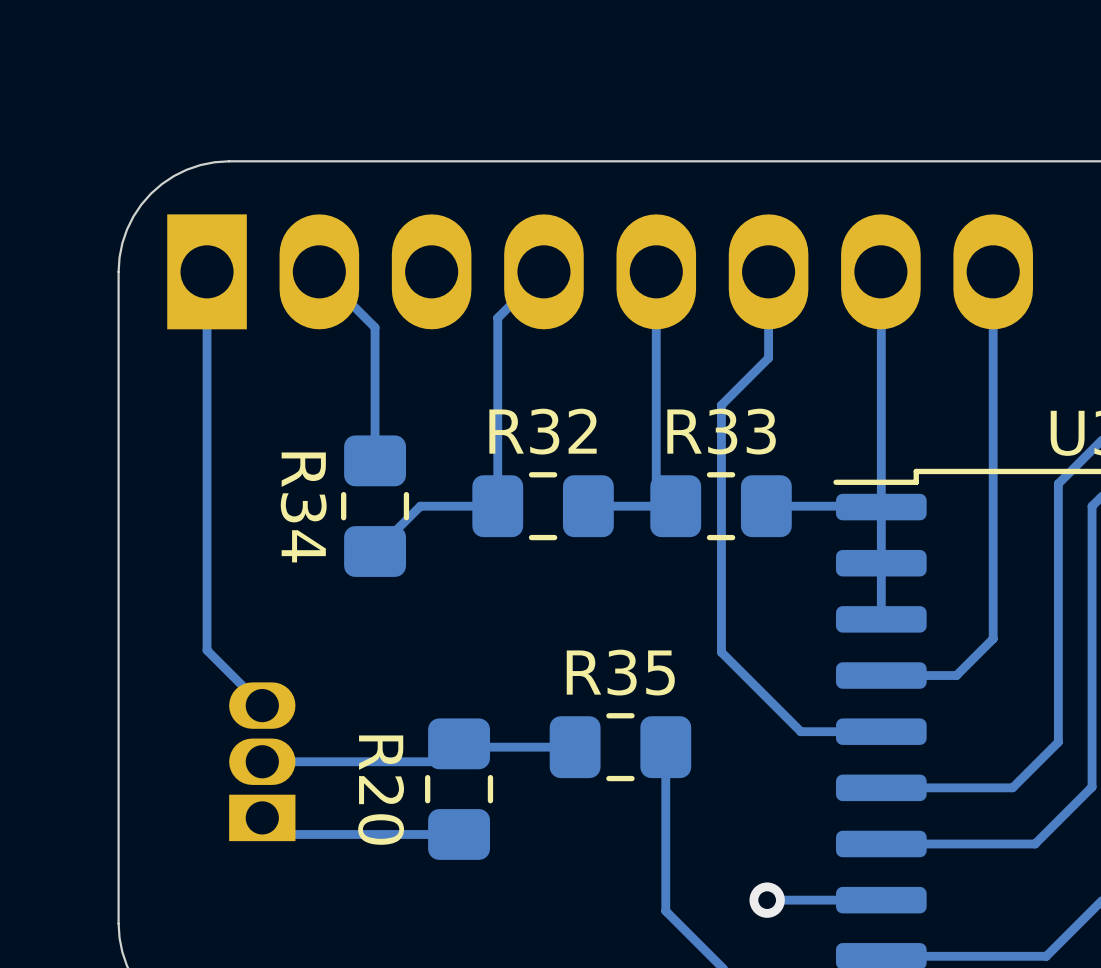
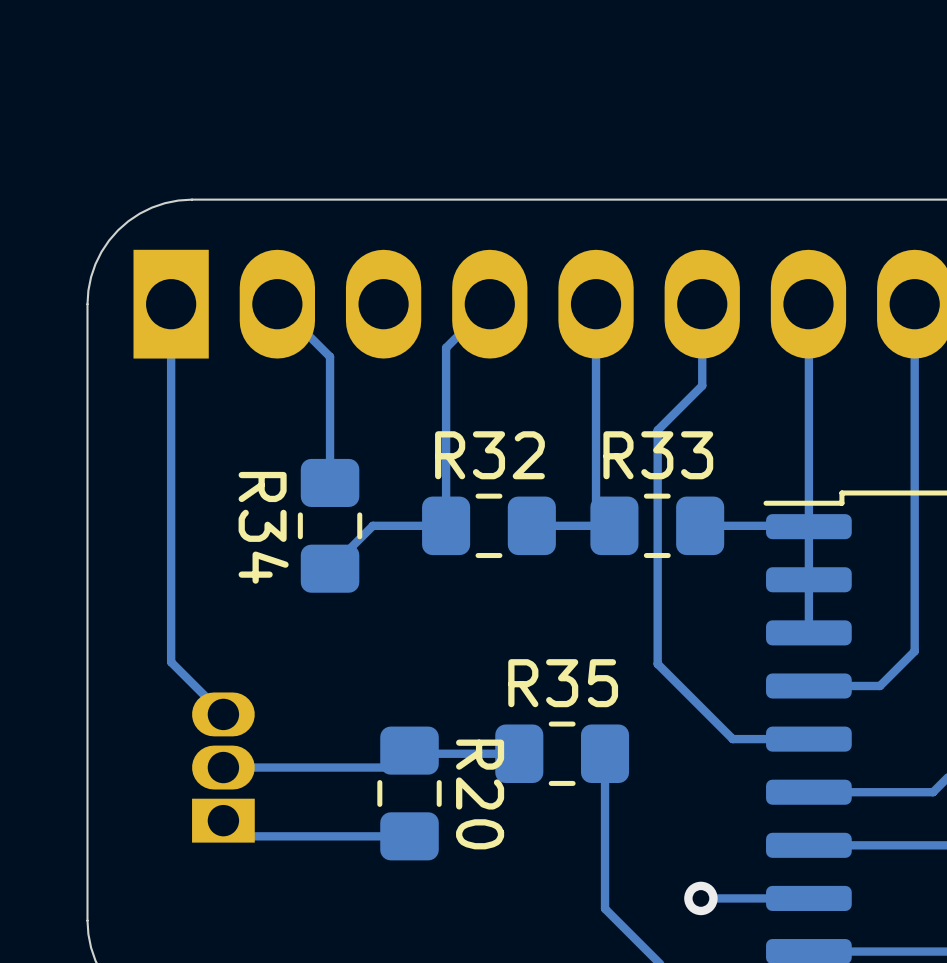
R20 name position: R20 (381, 790) -> R20 (480, 794)

